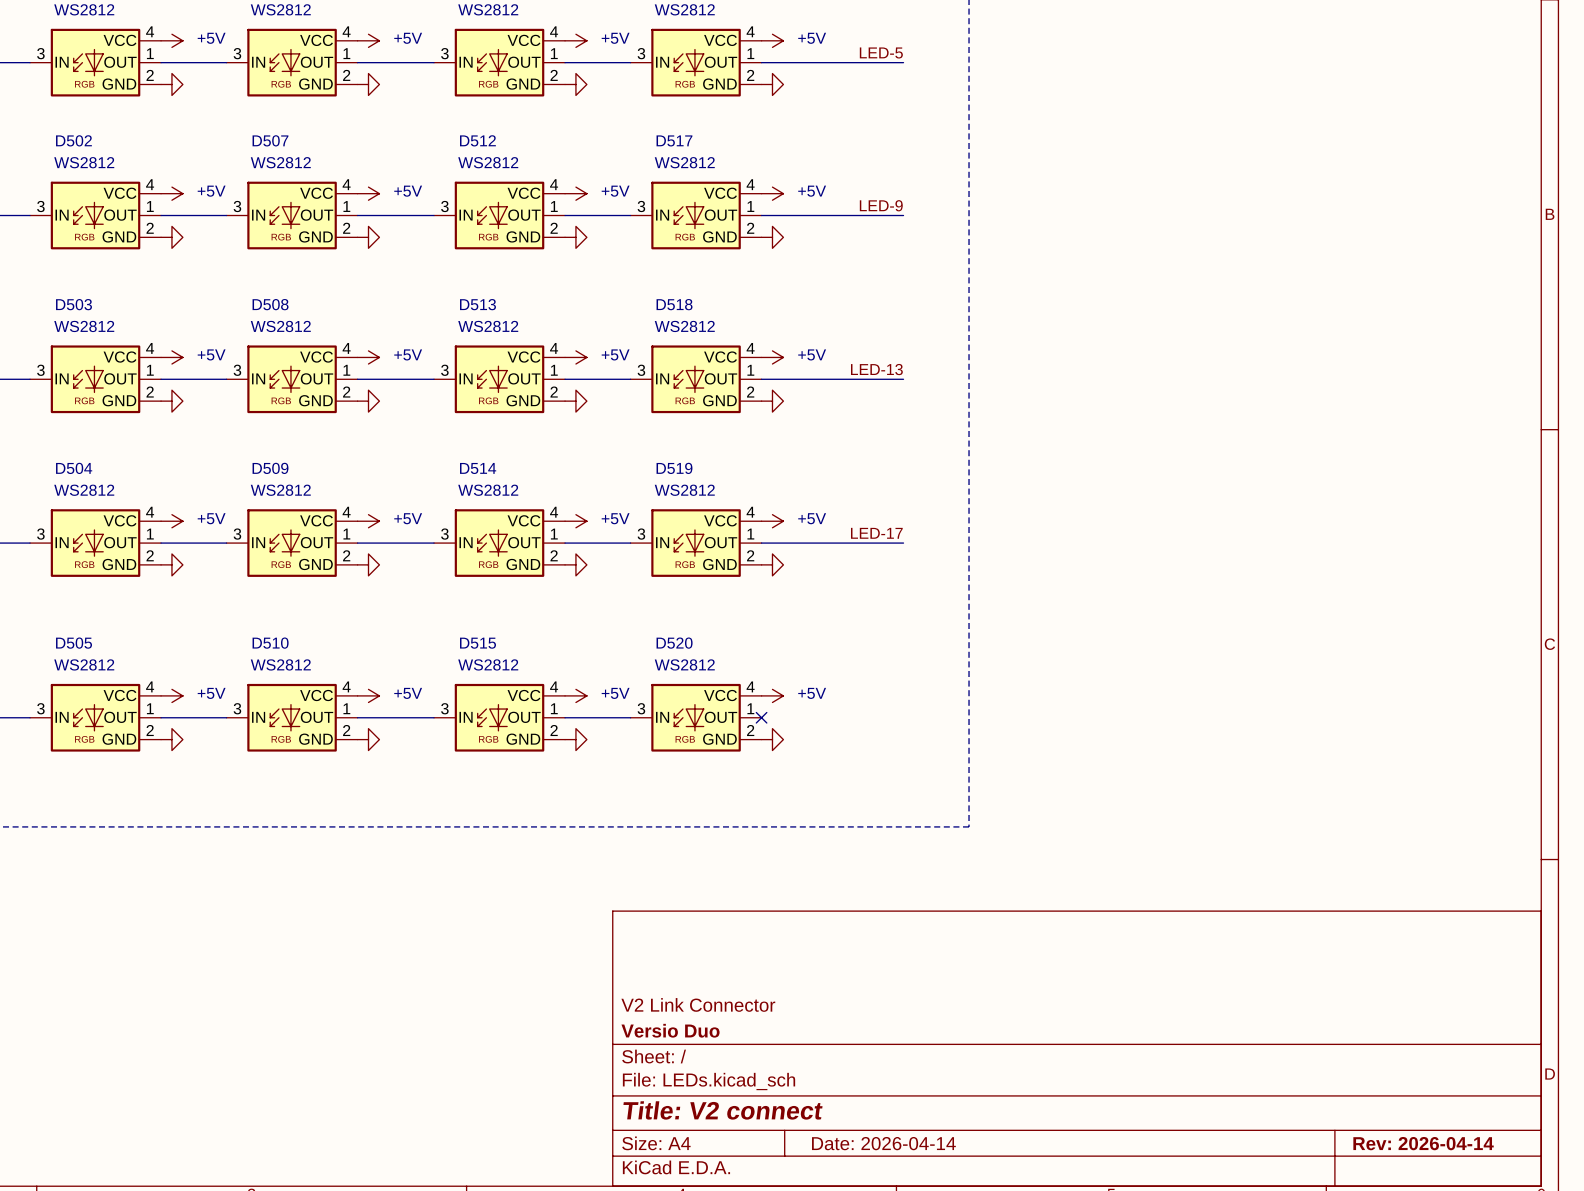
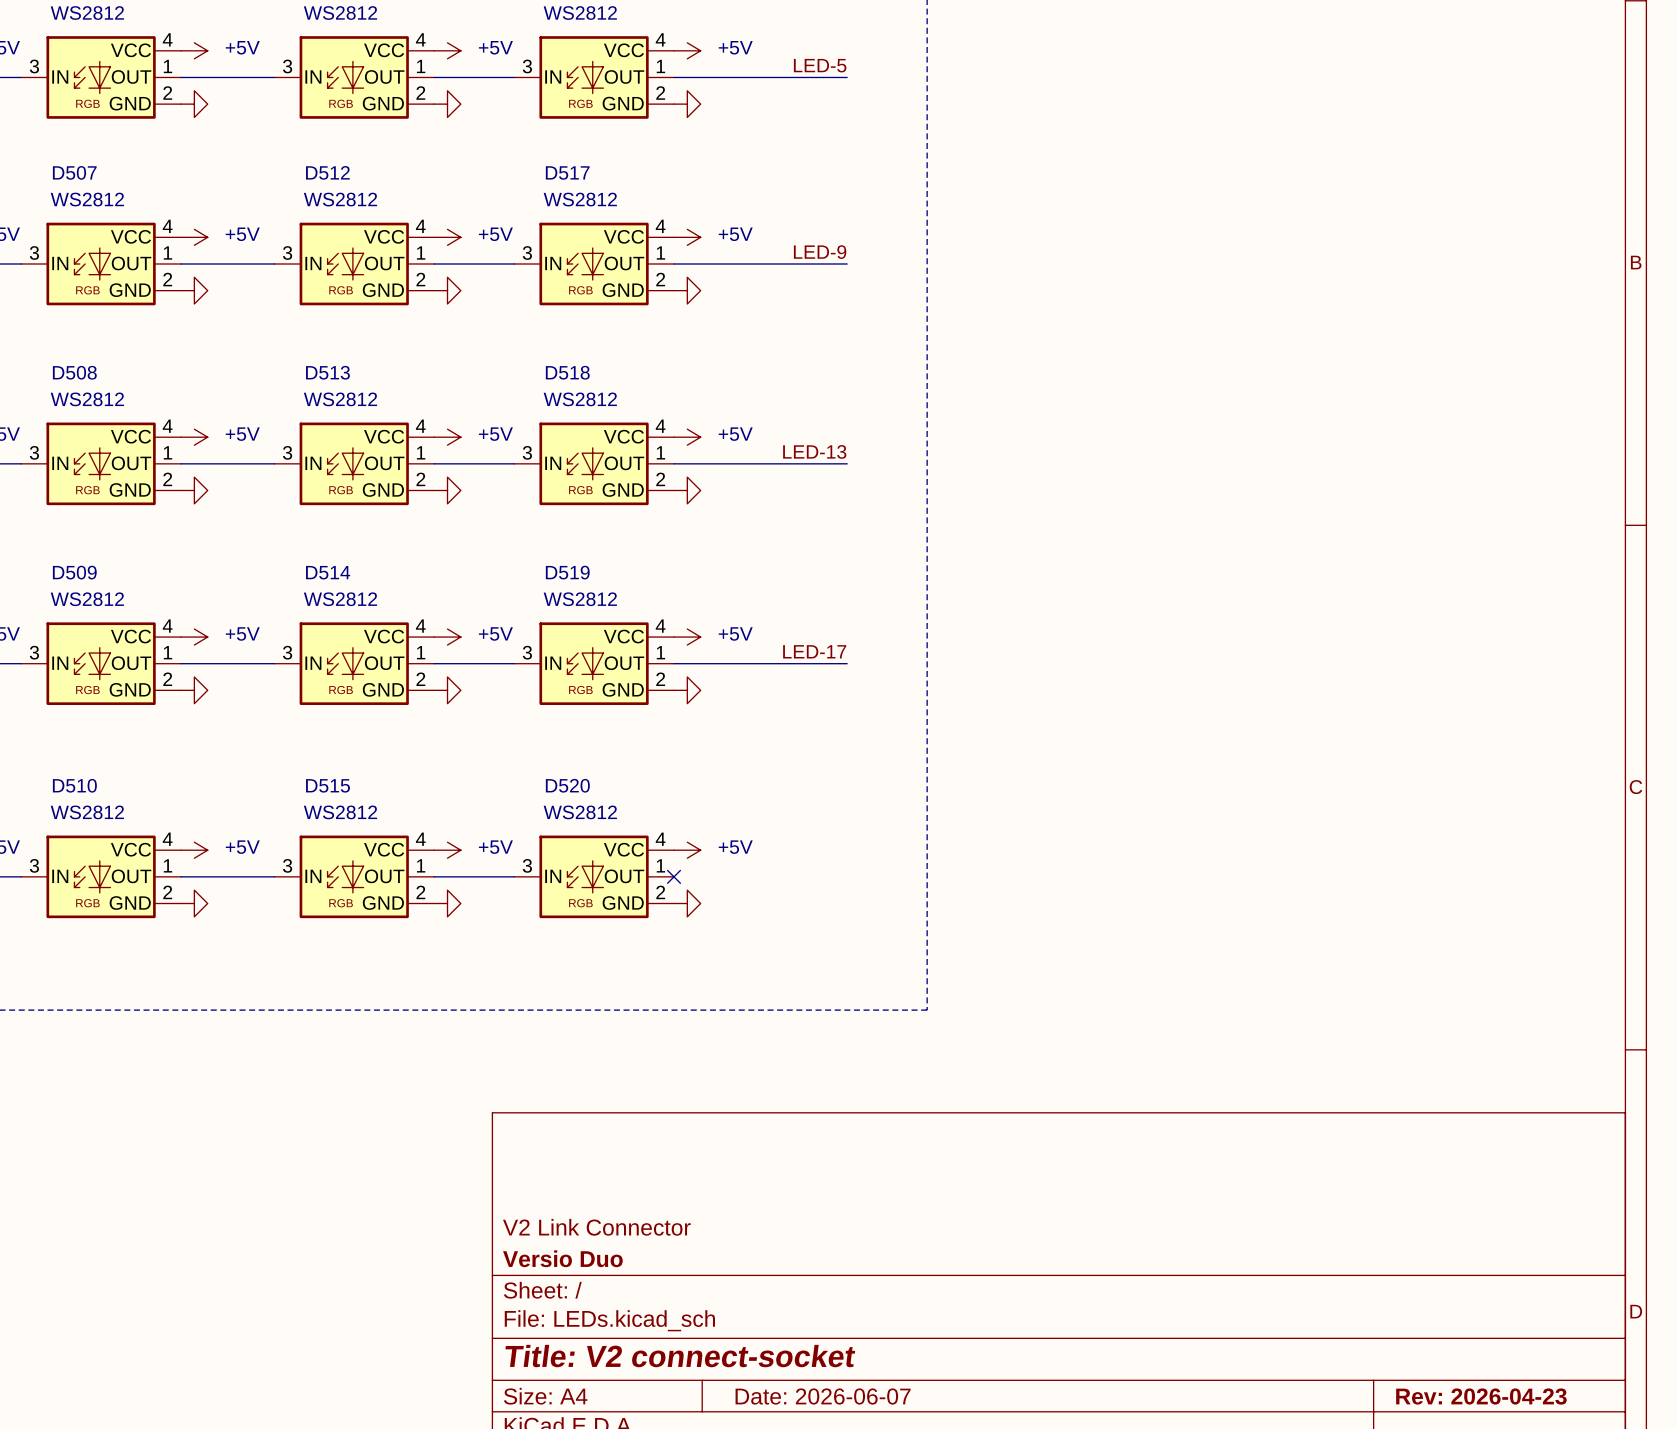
title block: Title: V2 connect (722, 1110) -> Title: V2 connect-socket (680, 1356)
title block: Date: 2026-04-14 (883, 1143) -> Date: 2026-06-07 (823, 1396)
title block: Rev: 2026-04-14 (1423, 1143) -> Rev: 2026-04-23 (1481, 1396)

